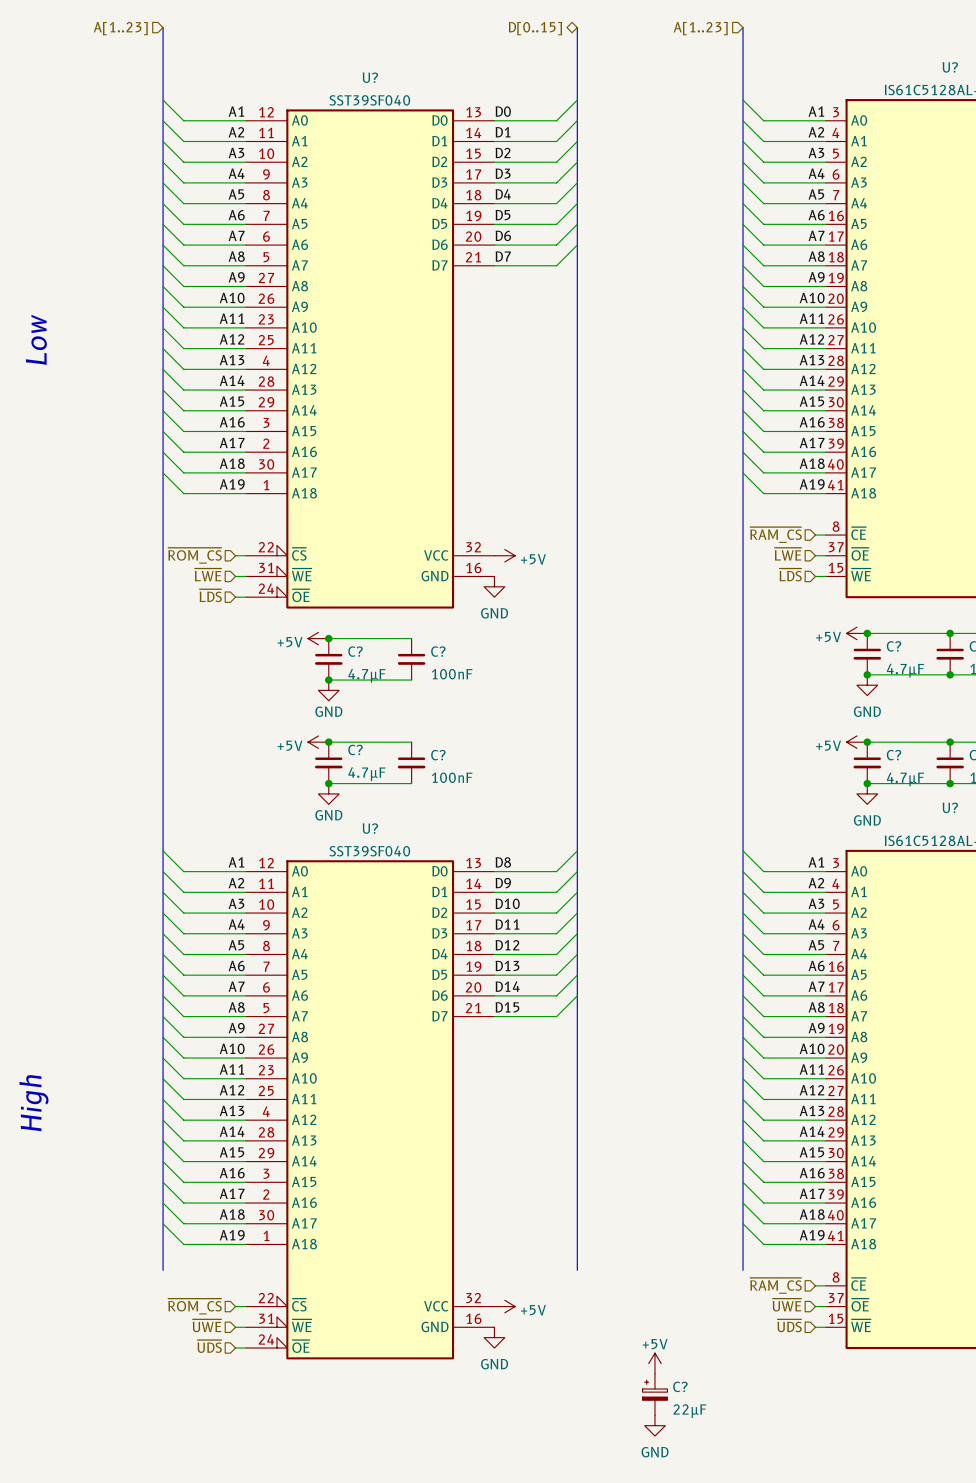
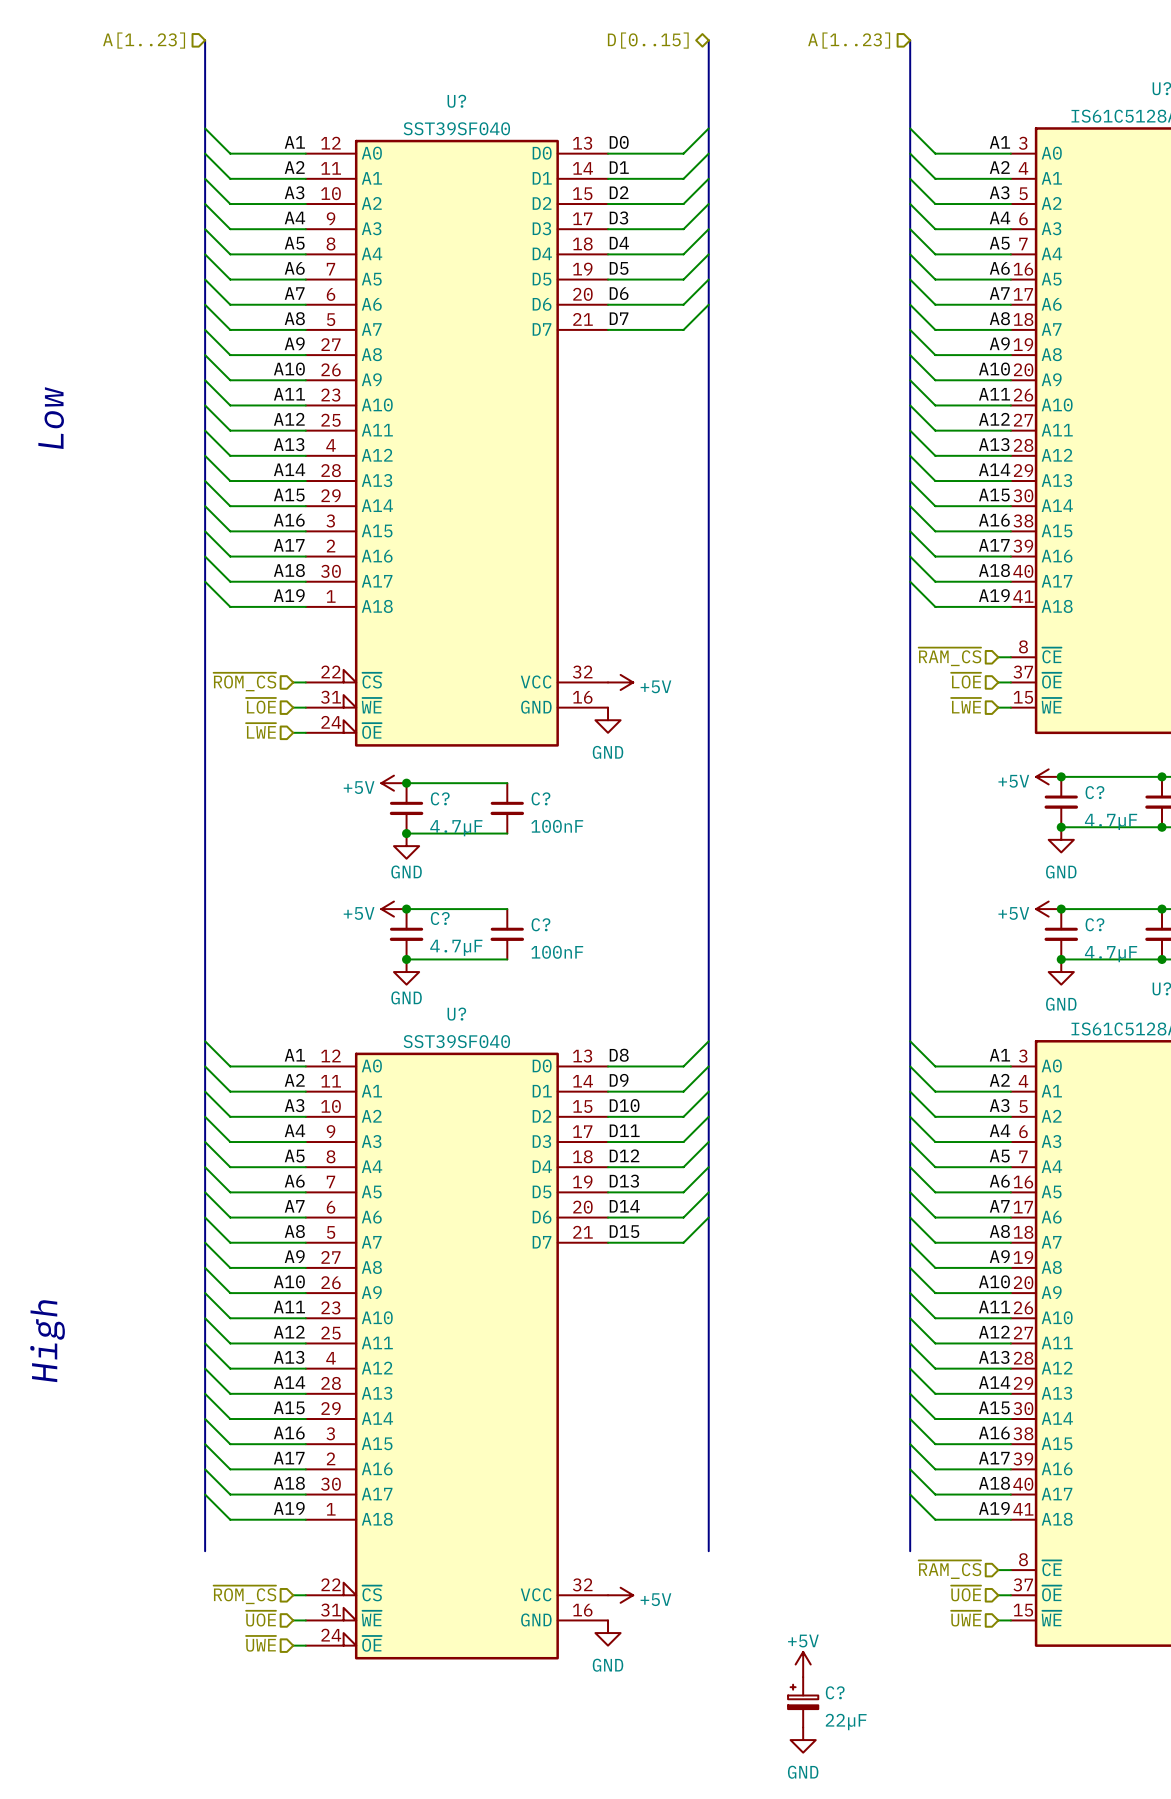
hierarchical label: ~{LWE} (788, 554) -> ~{LOE} (966, 680)
hierarchical label: ~{LWE} (208, 574) -> ~{LOE} (261, 705)
hierarchical label: ~{LDS} (790, 574) -> ~{LWE} (966, 705)
hierarchical label: ~{LDS} (210, 595) -> ~{LWE} (261, 730)
hierarchical label: ~{UWE} (787, 1305) -> ~{UOE} (966, 1593)
hierarchical label: ~{UWE} (207, 1325) -> ~{UOE} (261, 1618)
hierarchical label: ~{UDS} (789, 1325) -> ~{UWE} (966, 1618)
hierarchical label: ~{UDS} (209, 1346) -> ~{UWE} (261, 1643)

